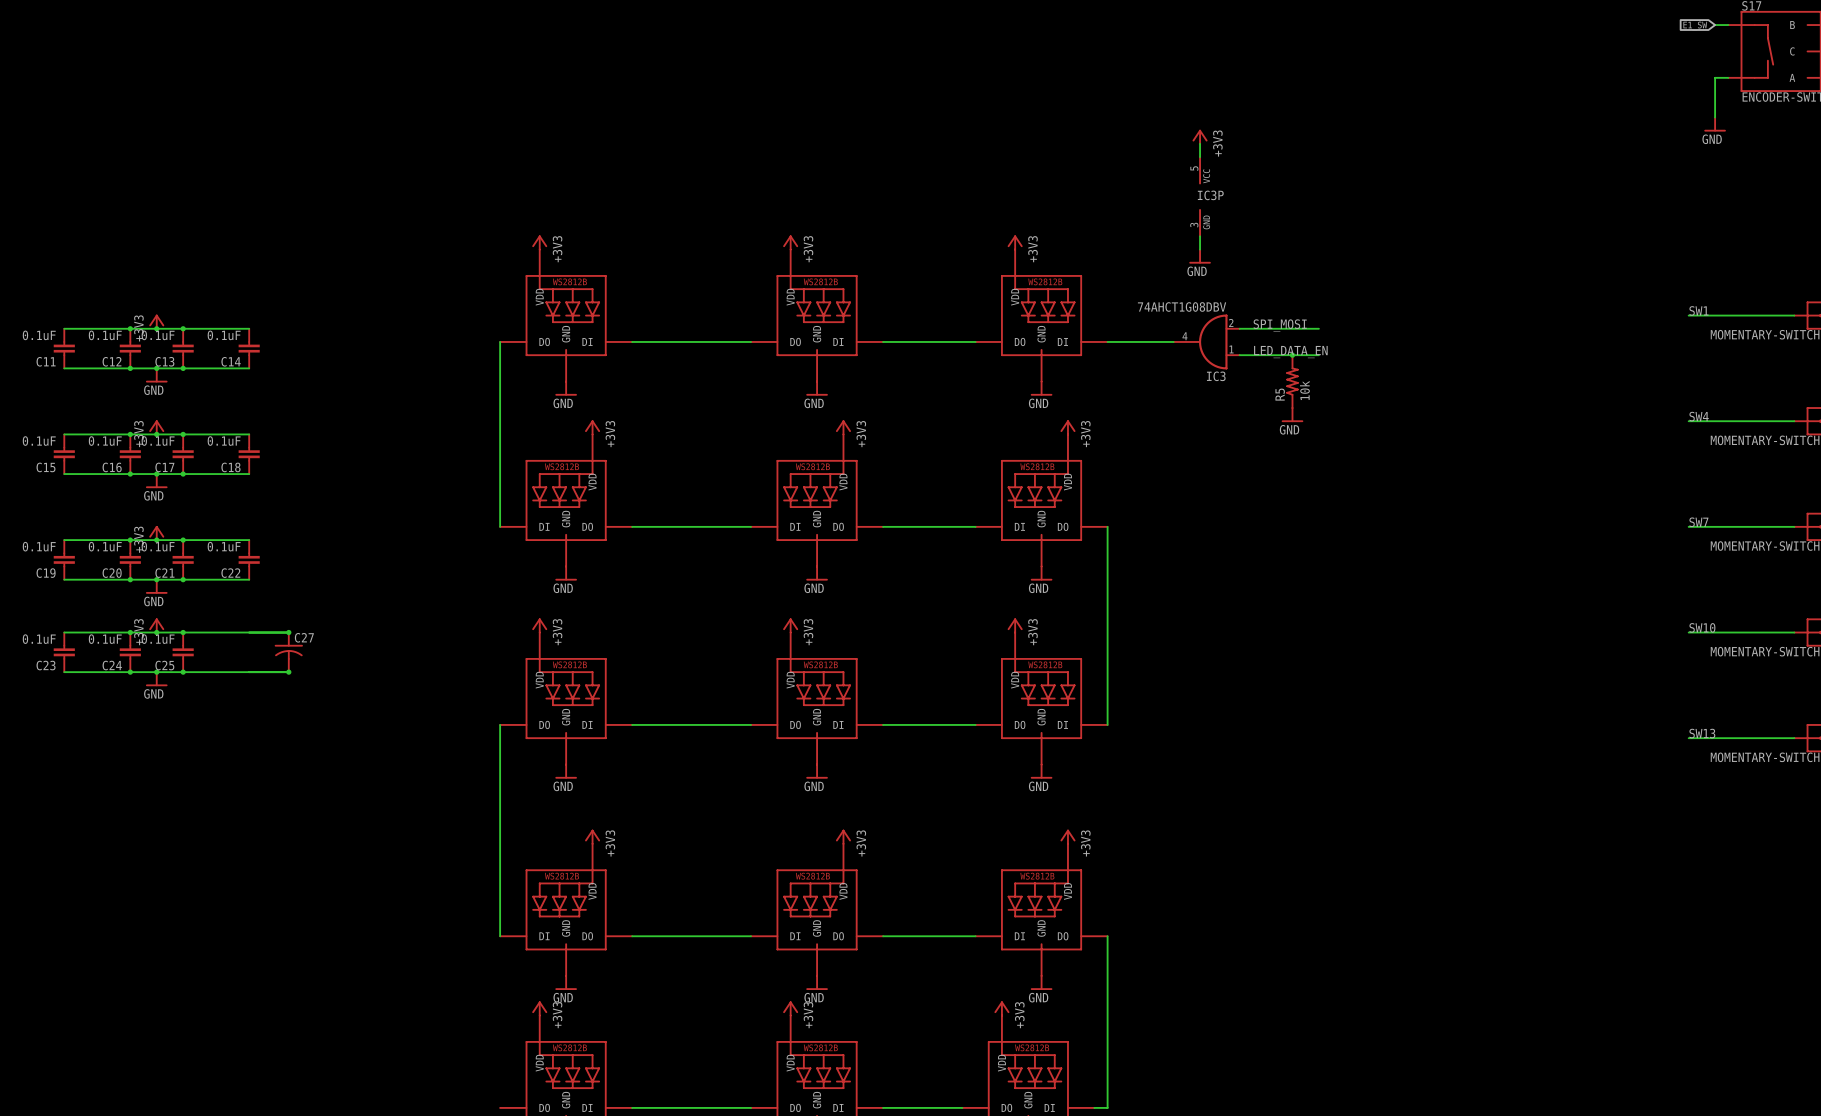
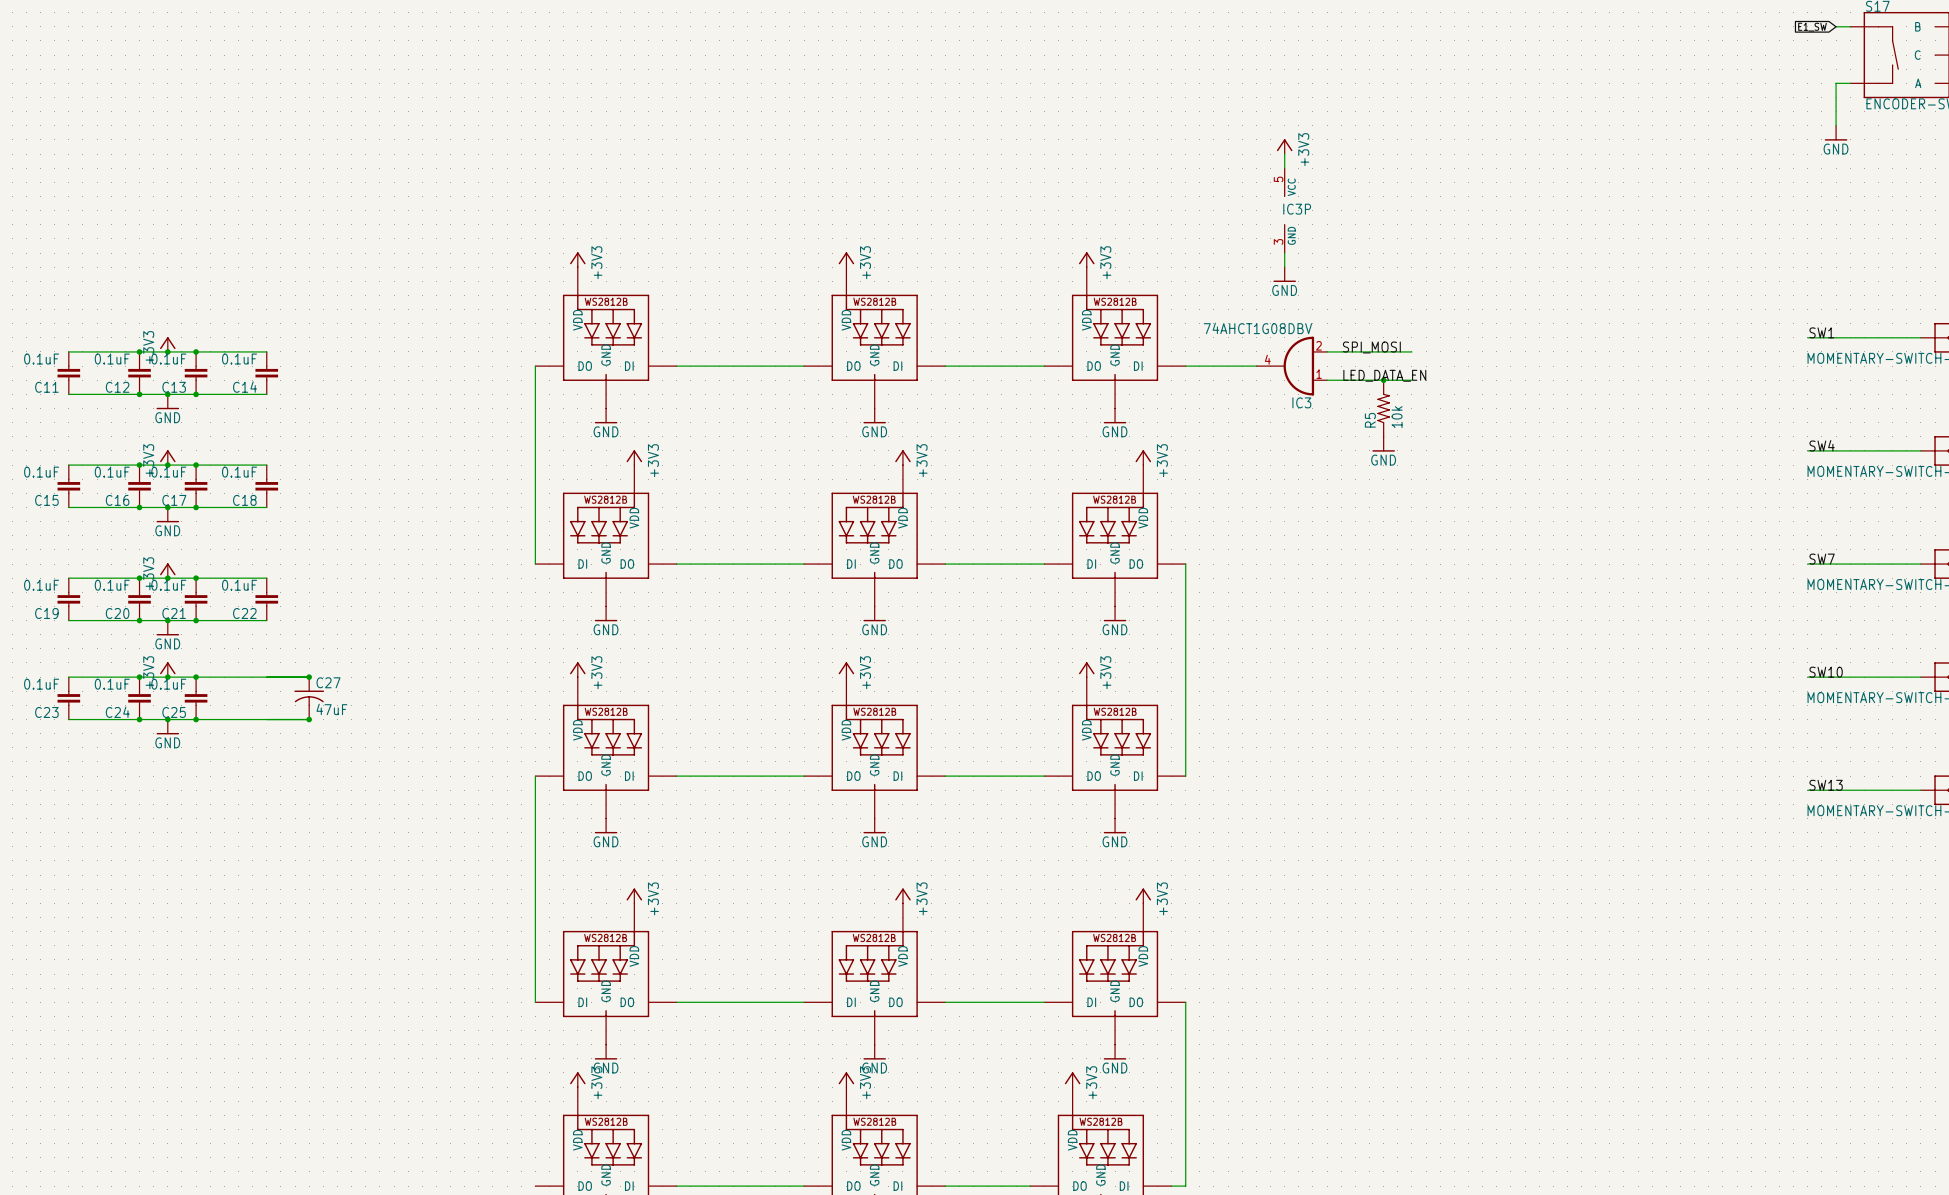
C27 value: none -> 47uF (331, 709)

